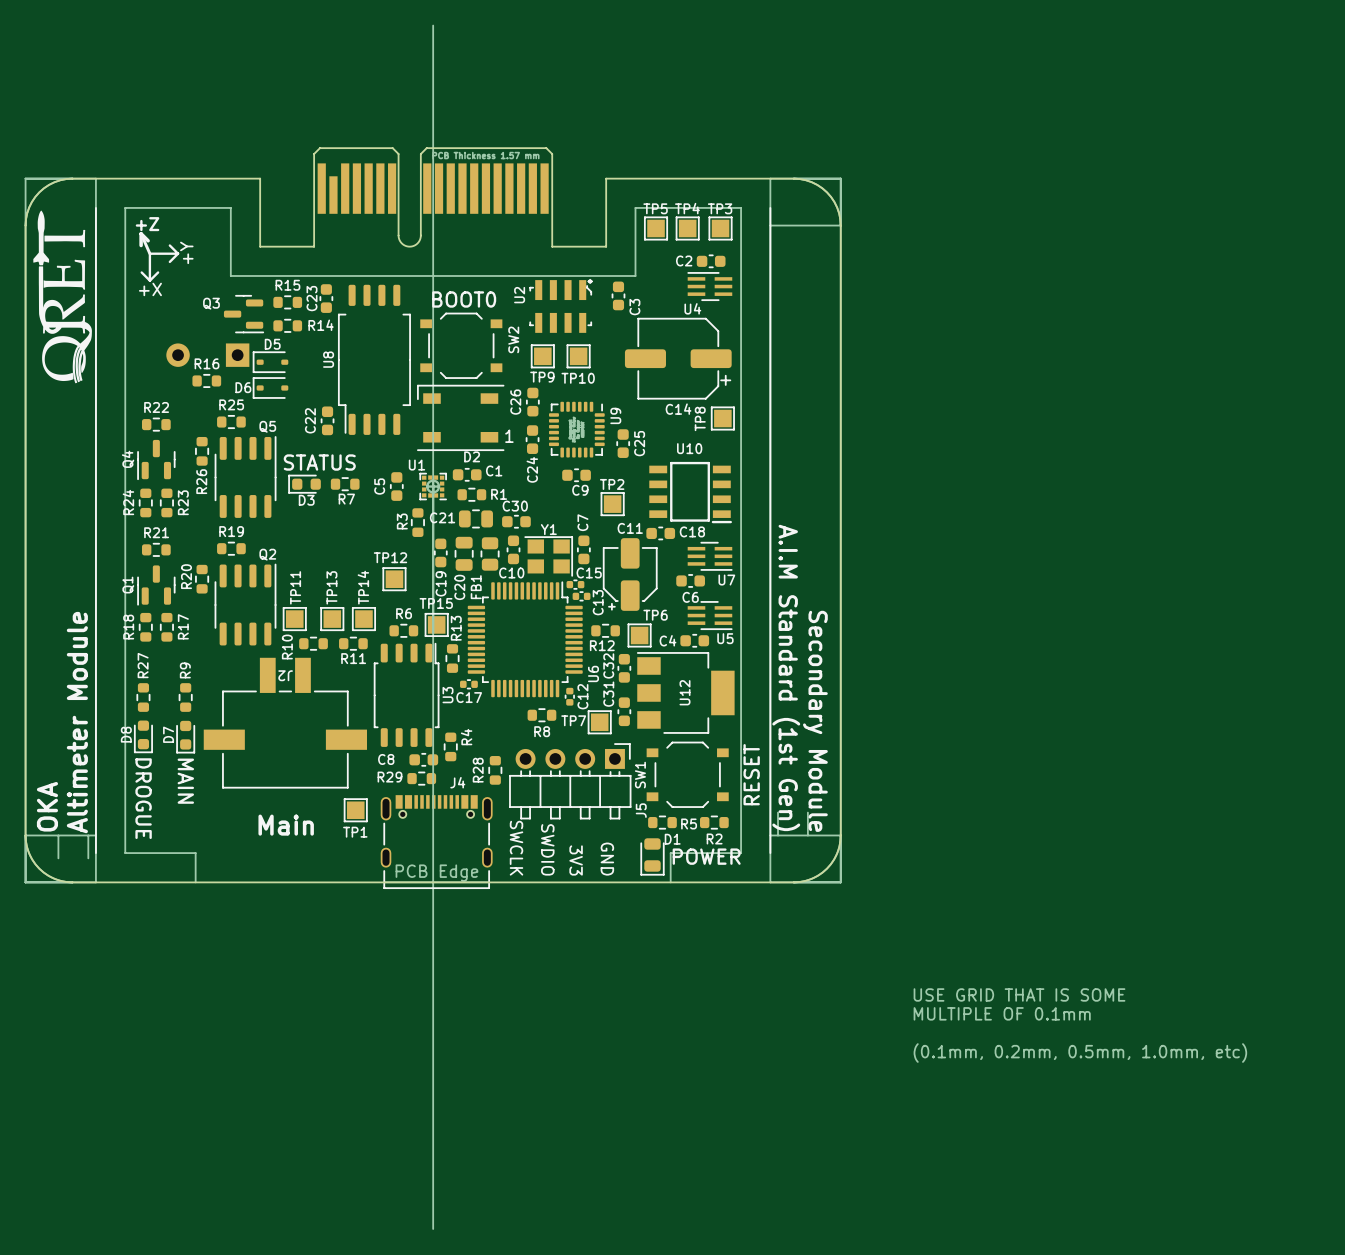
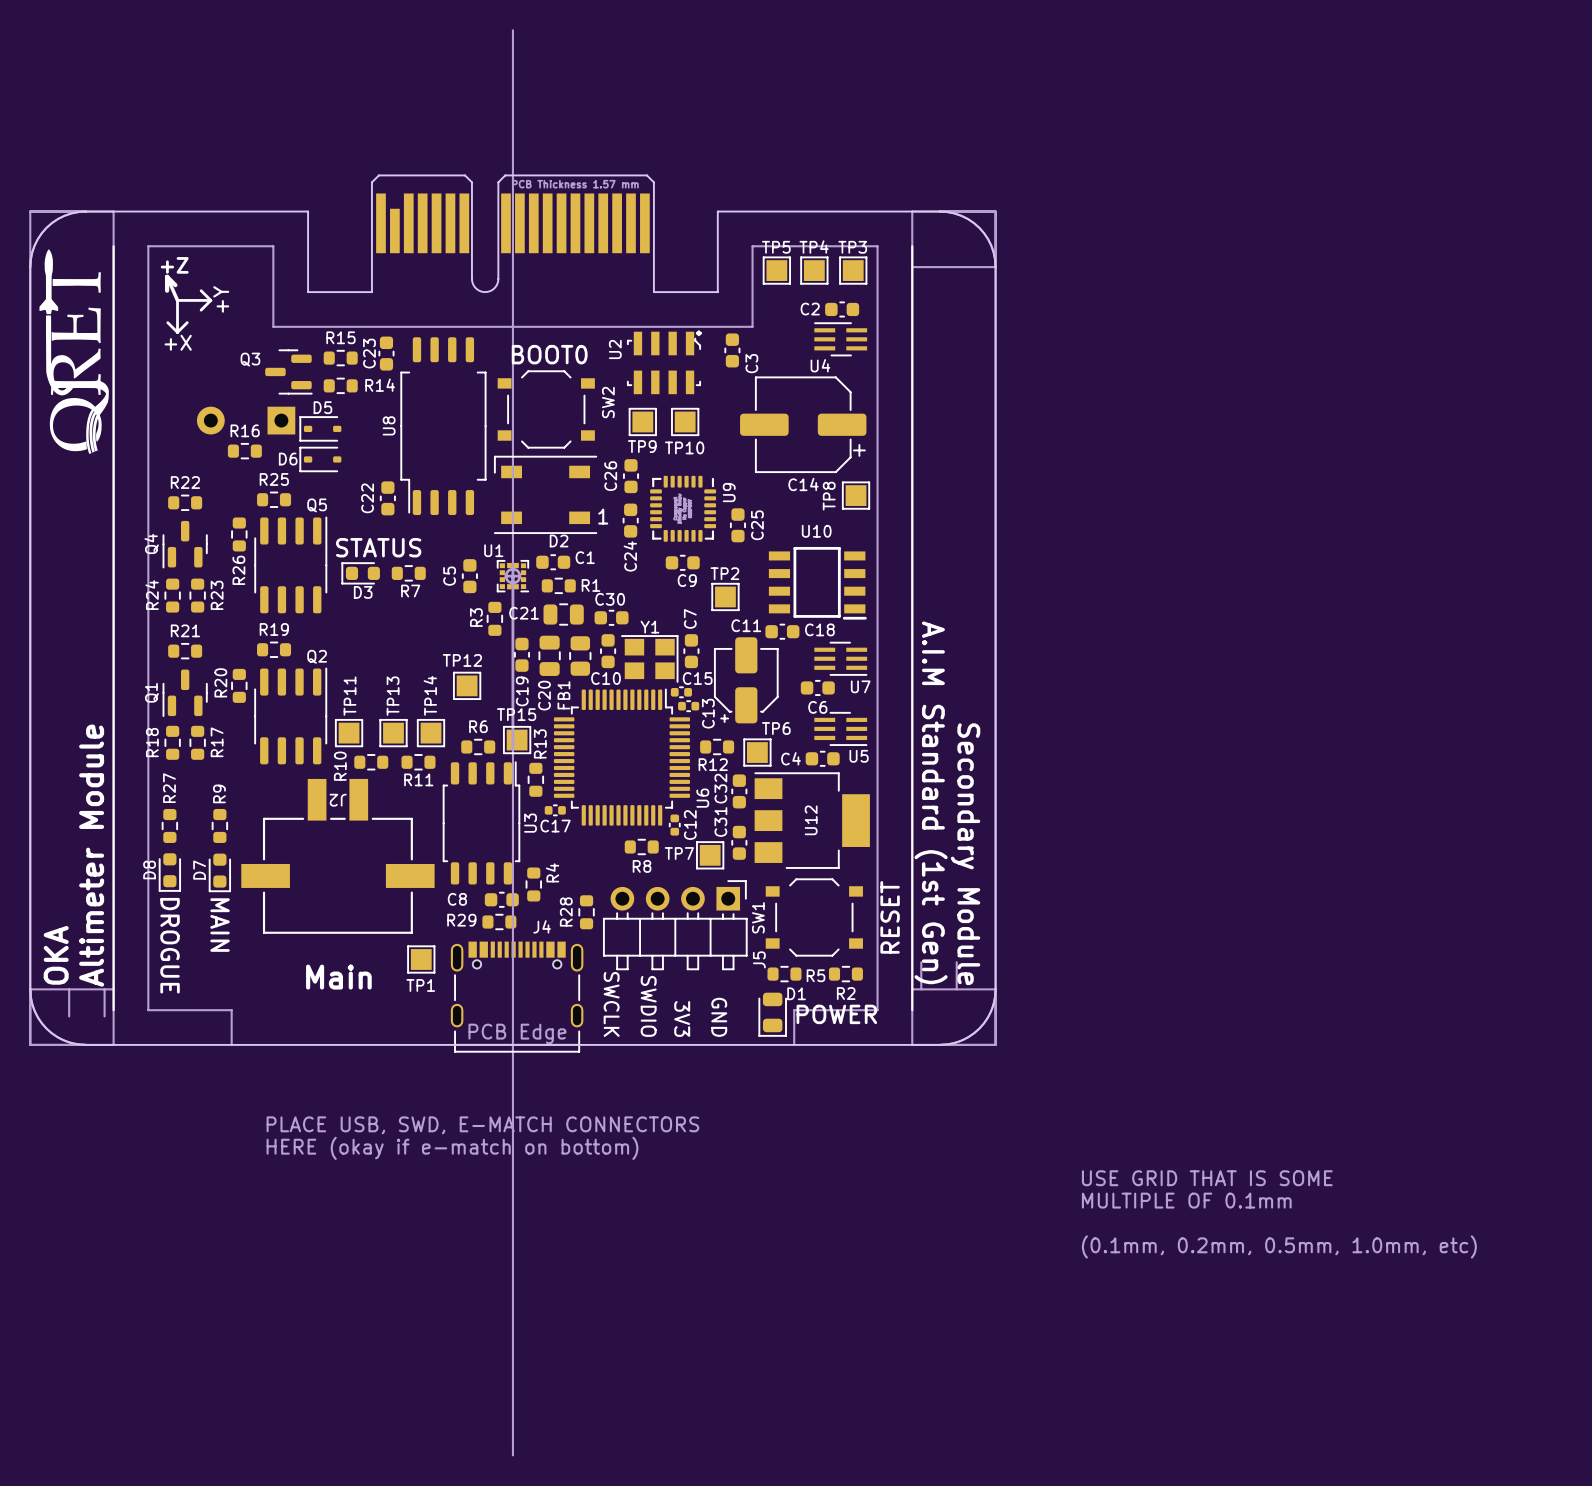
text: none -> PLACE USB, SWD, E-MATCH CONNECTORS (482, 1125)
text: none -> HERE (okay if e-match on bottom) (452, 1148)

